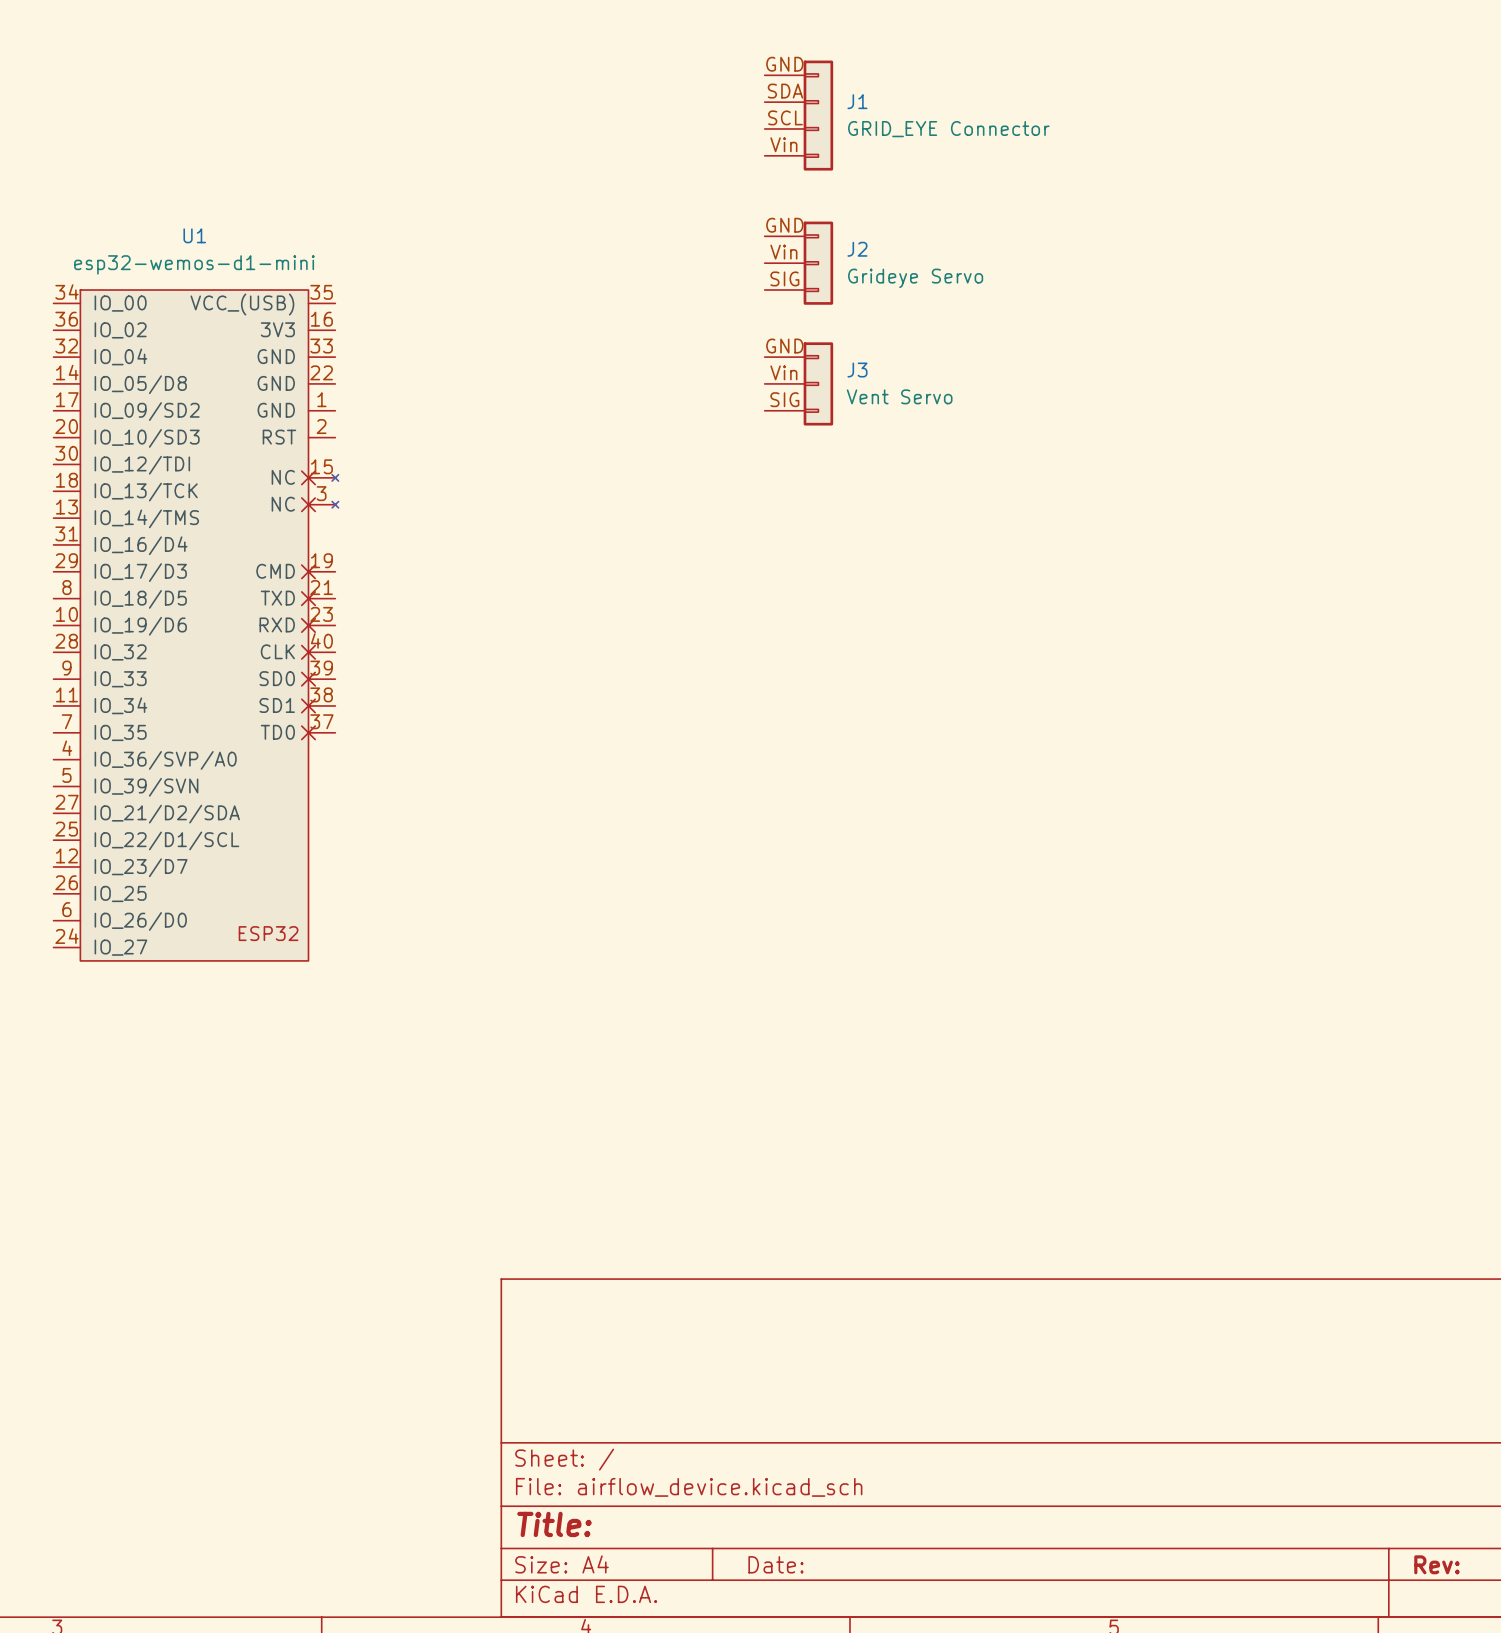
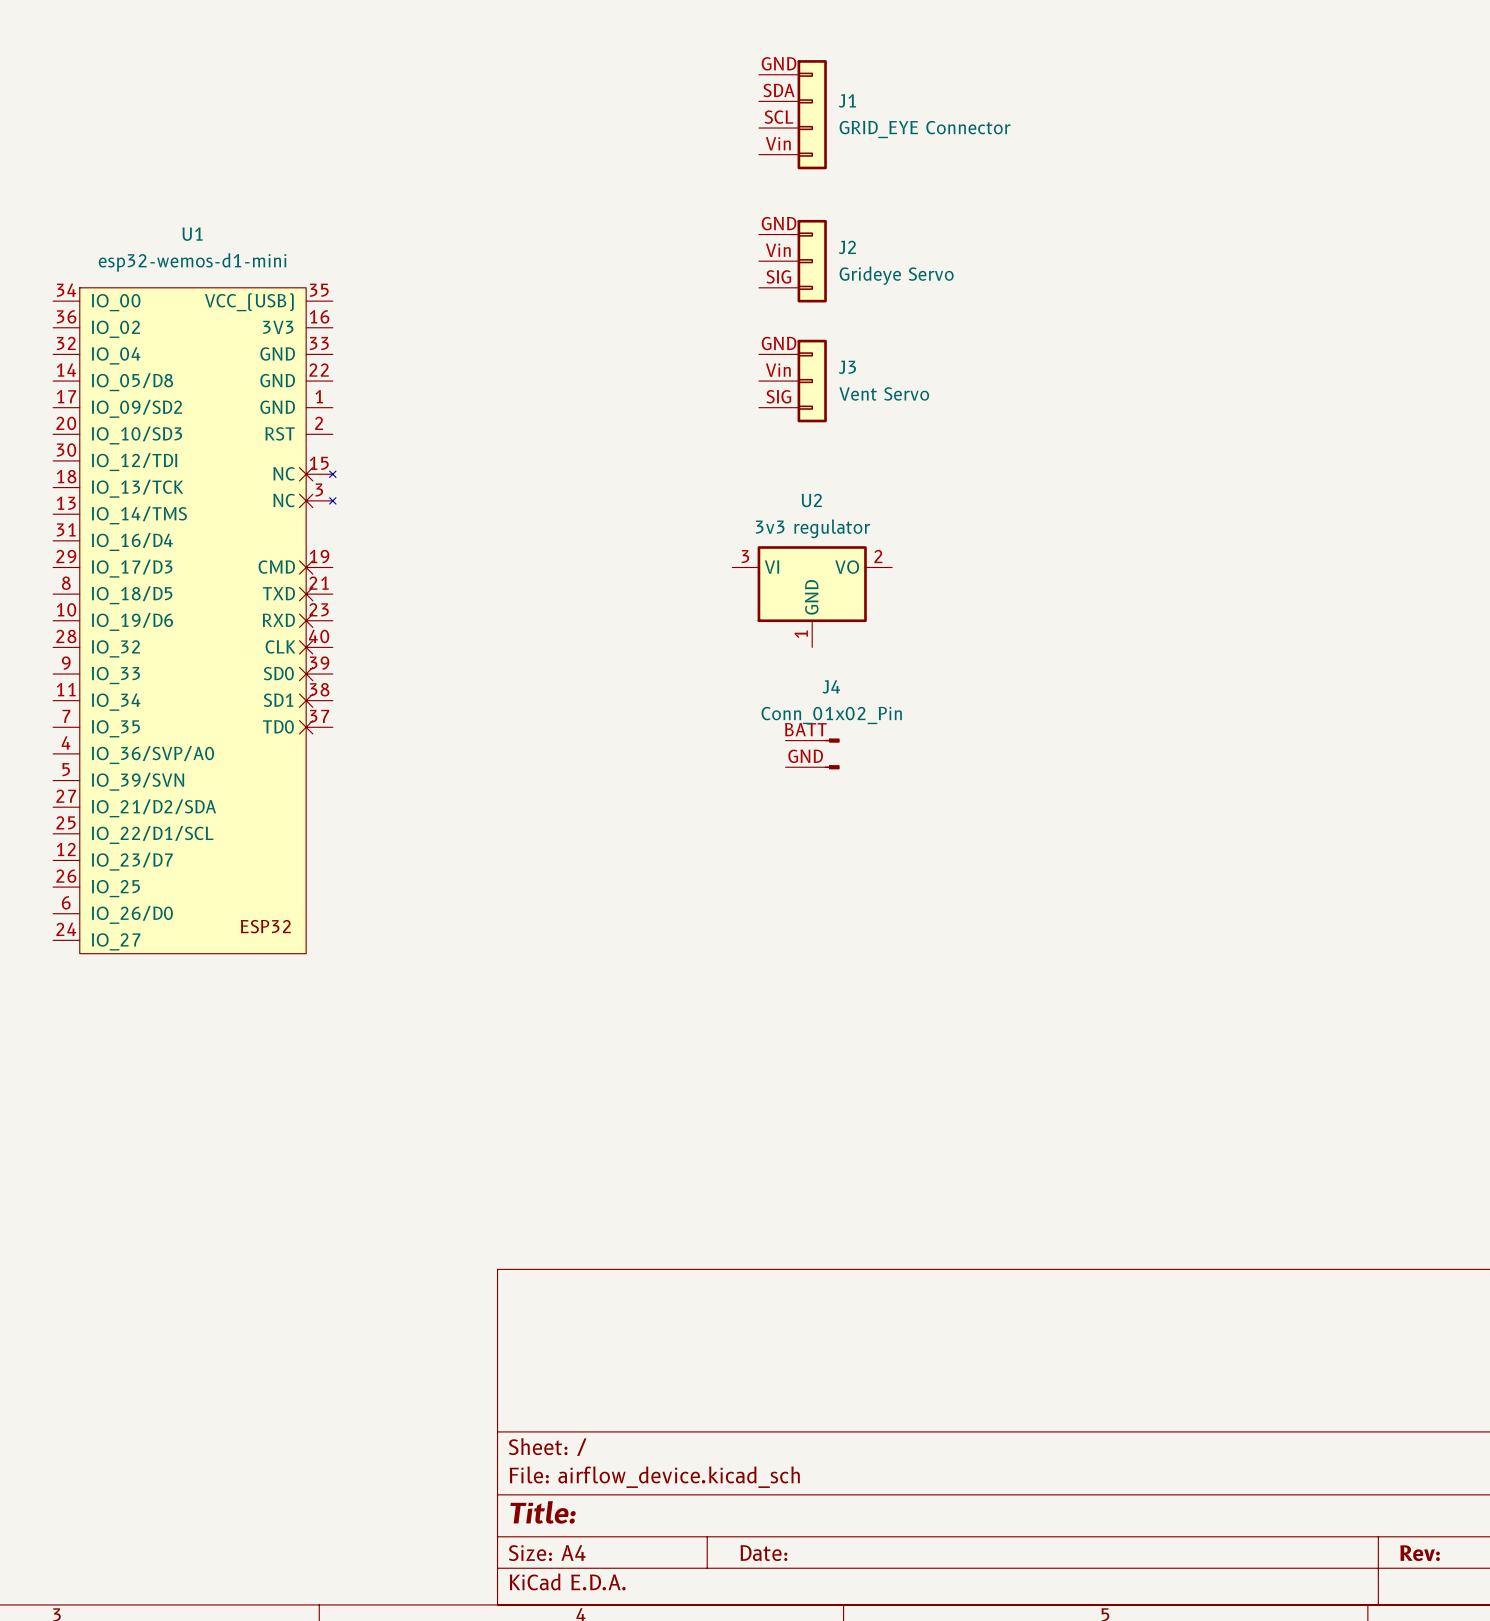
U2: none -> 3v3 regulator (812, 596)
J4: none -> Conn_01x02_Pin (812, 753)

